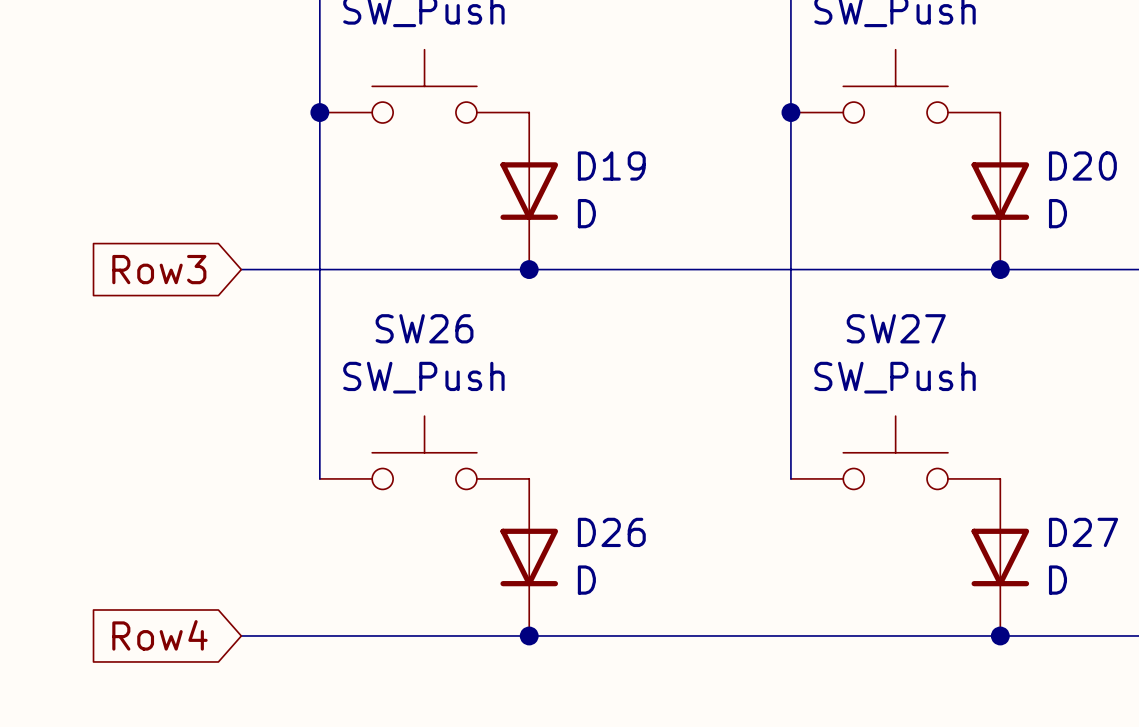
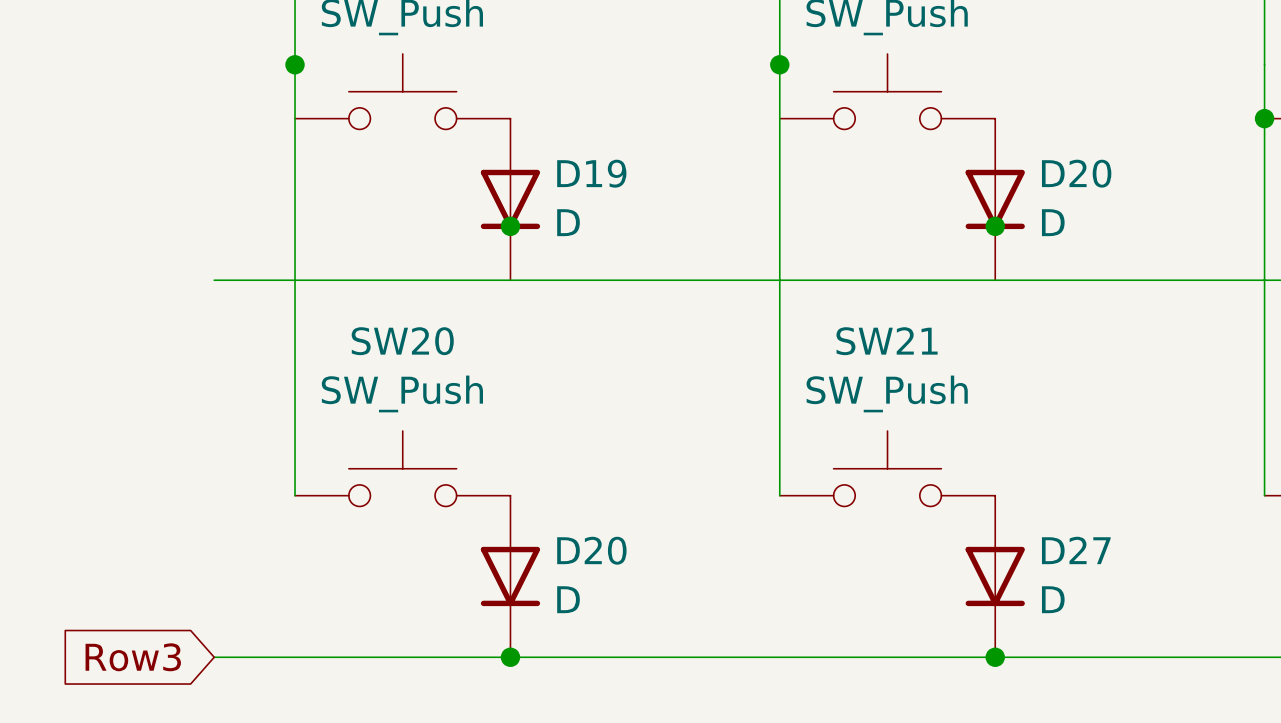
junction position: (319, 112) -> (295, 64)
junction position: (790, 112) -> (779, 64)
global label: Row3 (159, 269) -> none
junction position: (529, 269) -> (510, 226)
junction position: (1000, 269) -> (995, 226)
SW26 name: SW26 (424, 328) -> SW20 (402, 341)
SW27 name: SW27 (896, 328) -> SW21 (887, 341)
D26 name: D26 (611, 532) -> D20 (591, 550)
global label: Row4 (159, 635) -> Row3 (133, 657)

